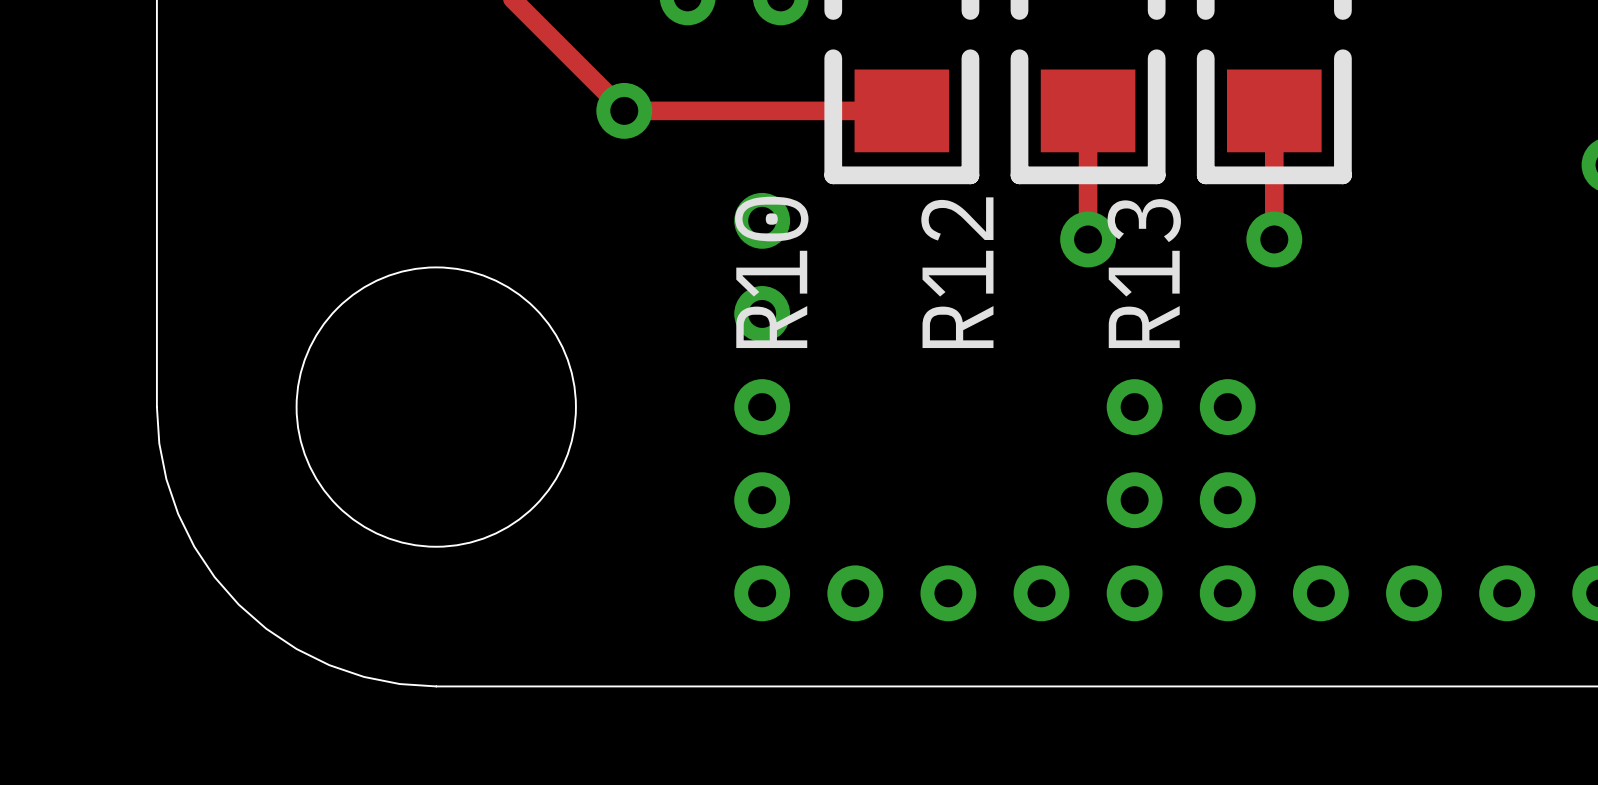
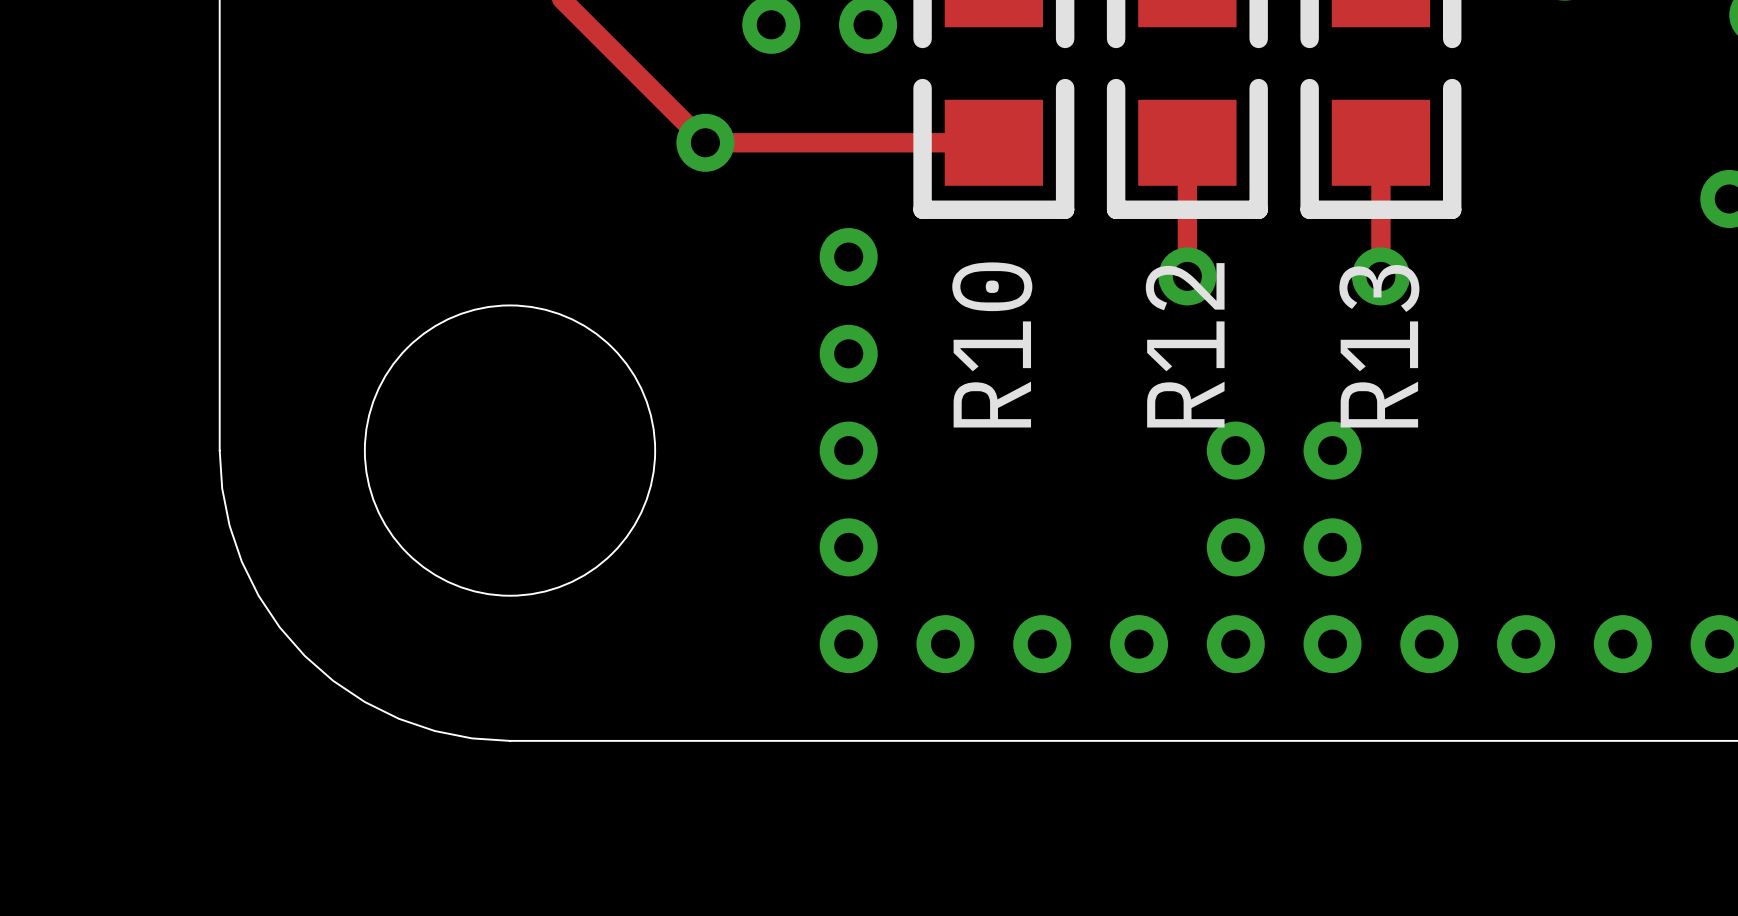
R10 name position: R10 (771, 272) -> R10 (992, 344)
R12 name position: R12 (957, 272) -> R12 (1185, 345)
R13 name position: R13 (1144, 273) -> R13 (1379, 346)

